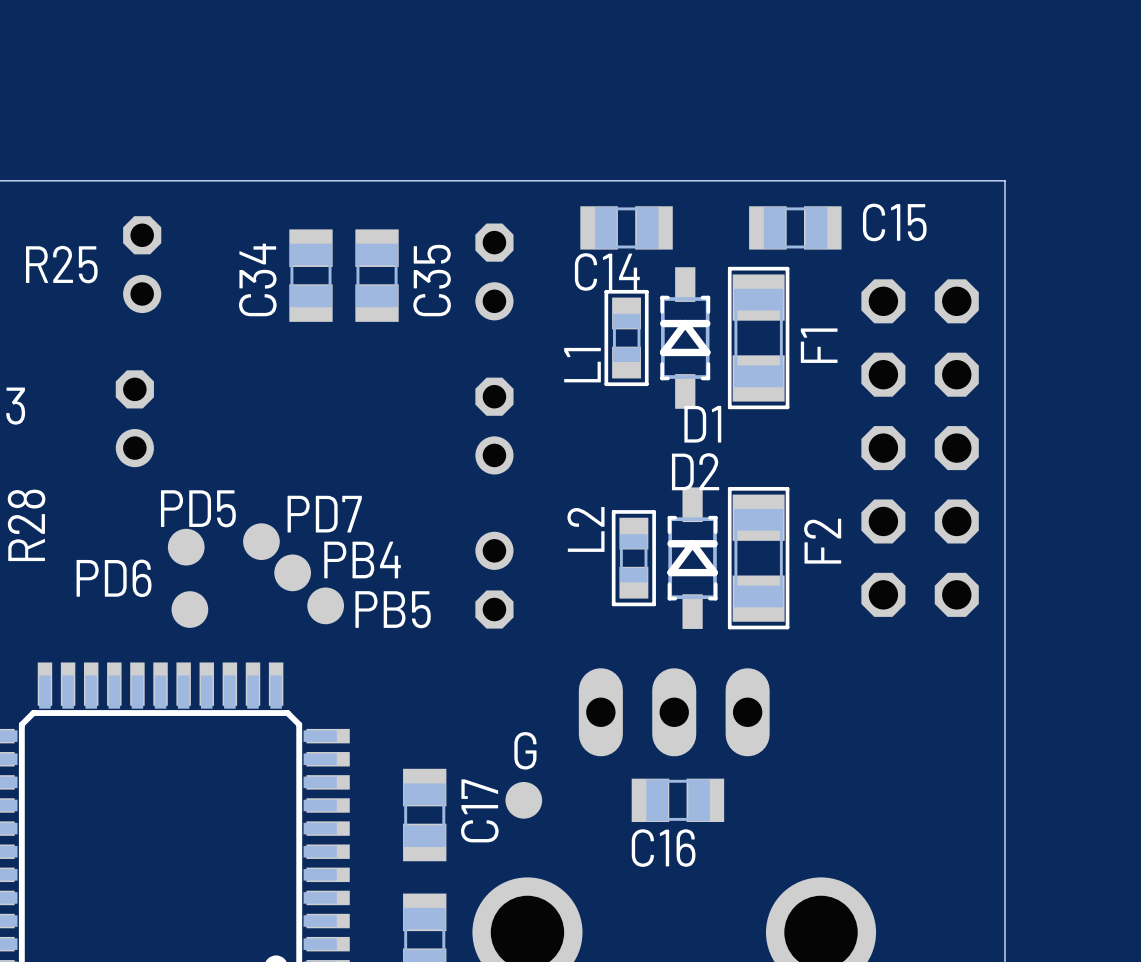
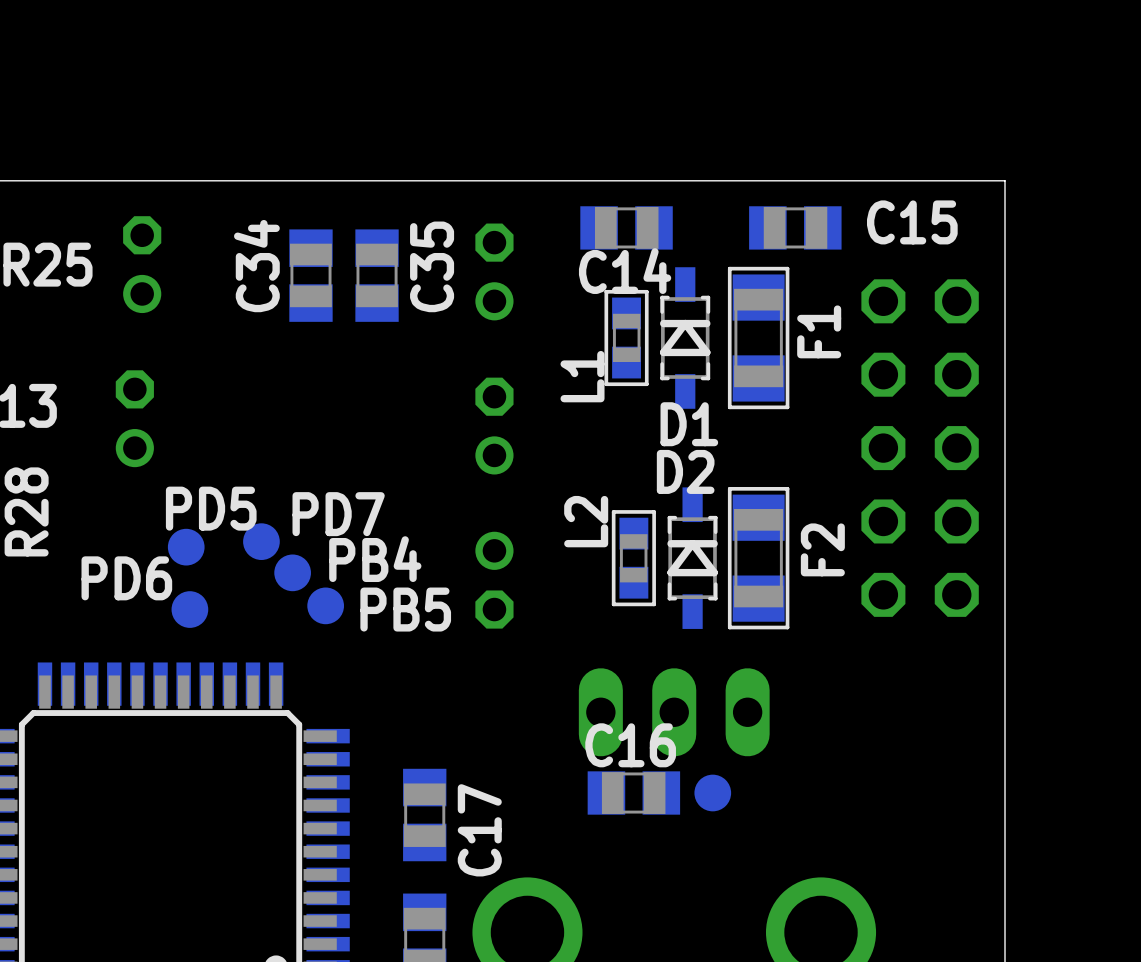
part: none -> (712, 793)
G: (523, 800) -> none
C16 position: (677, 800) -> (633, 793)
C16 name position: C16 (663, 848) -> C16 (630, 745)

